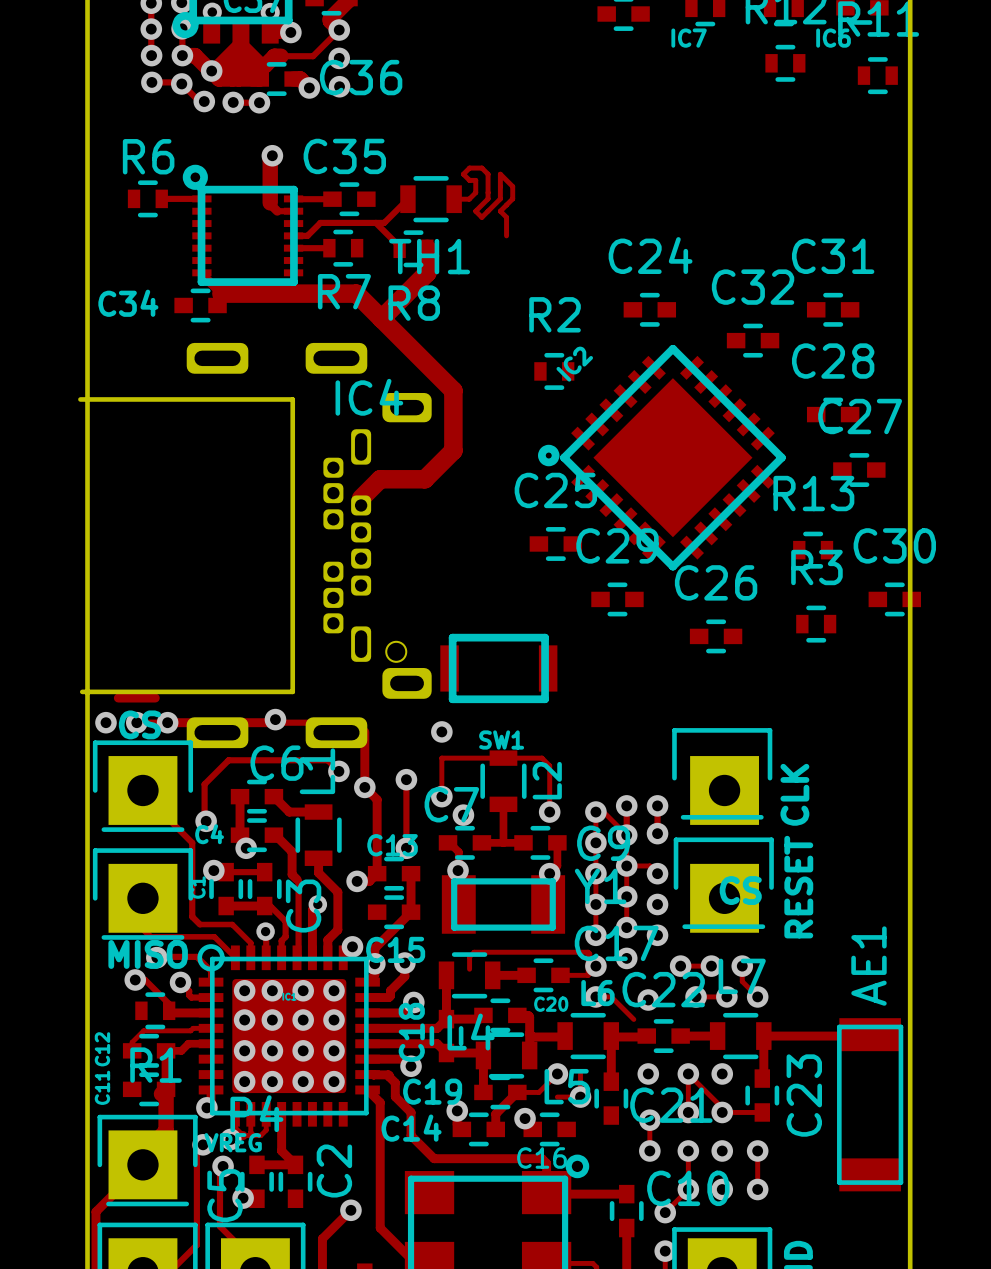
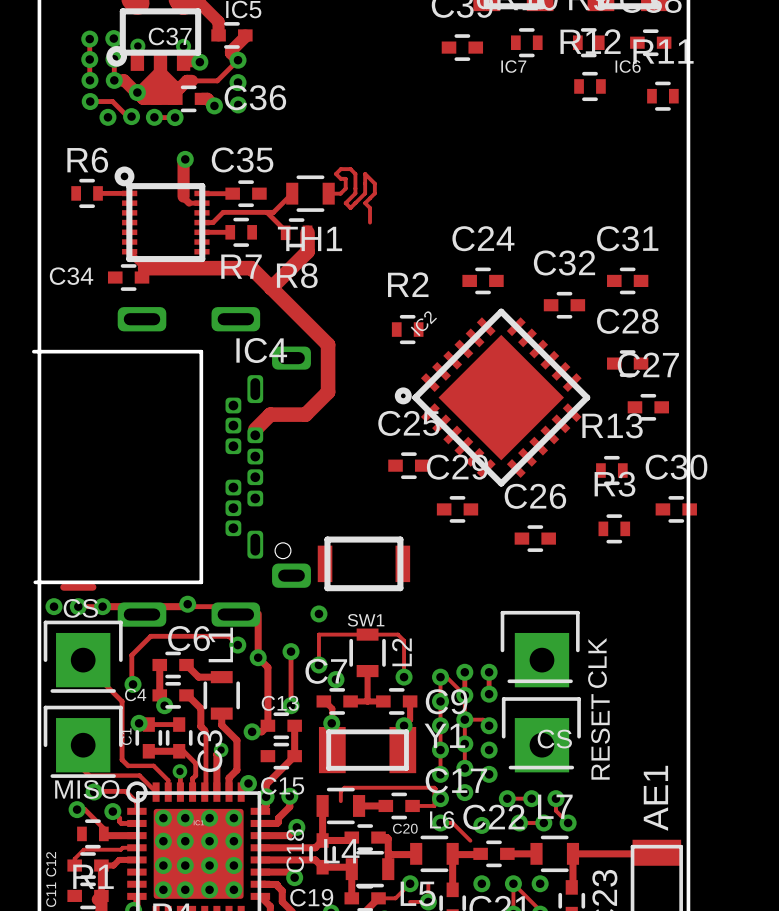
via position: (181, 83) -> (107, 117)

